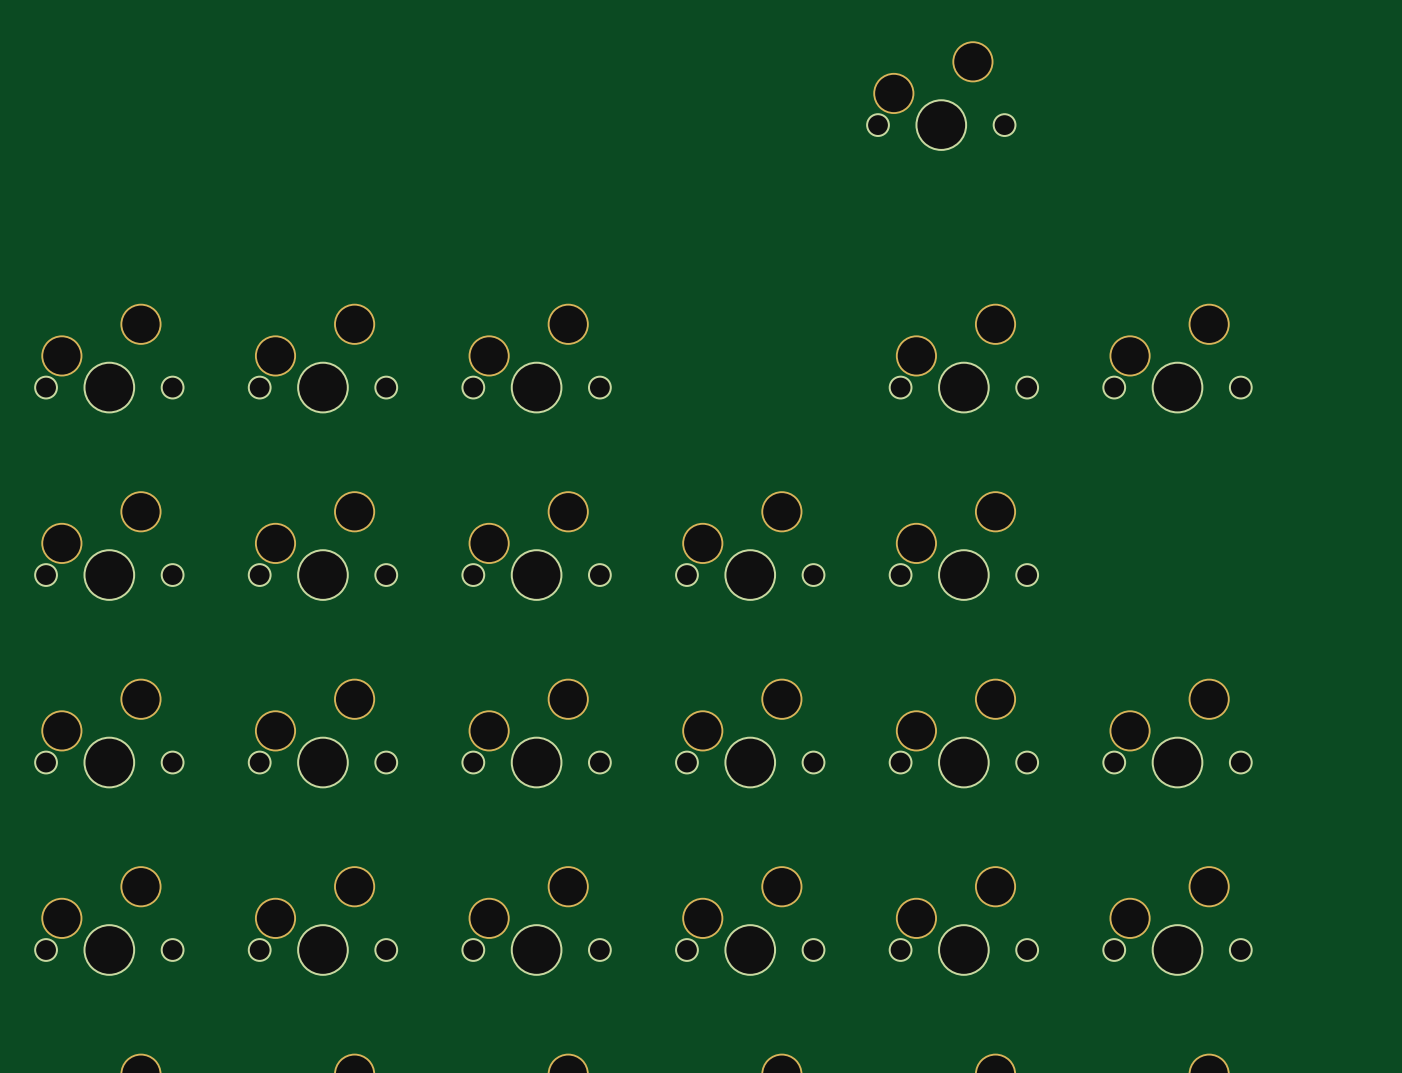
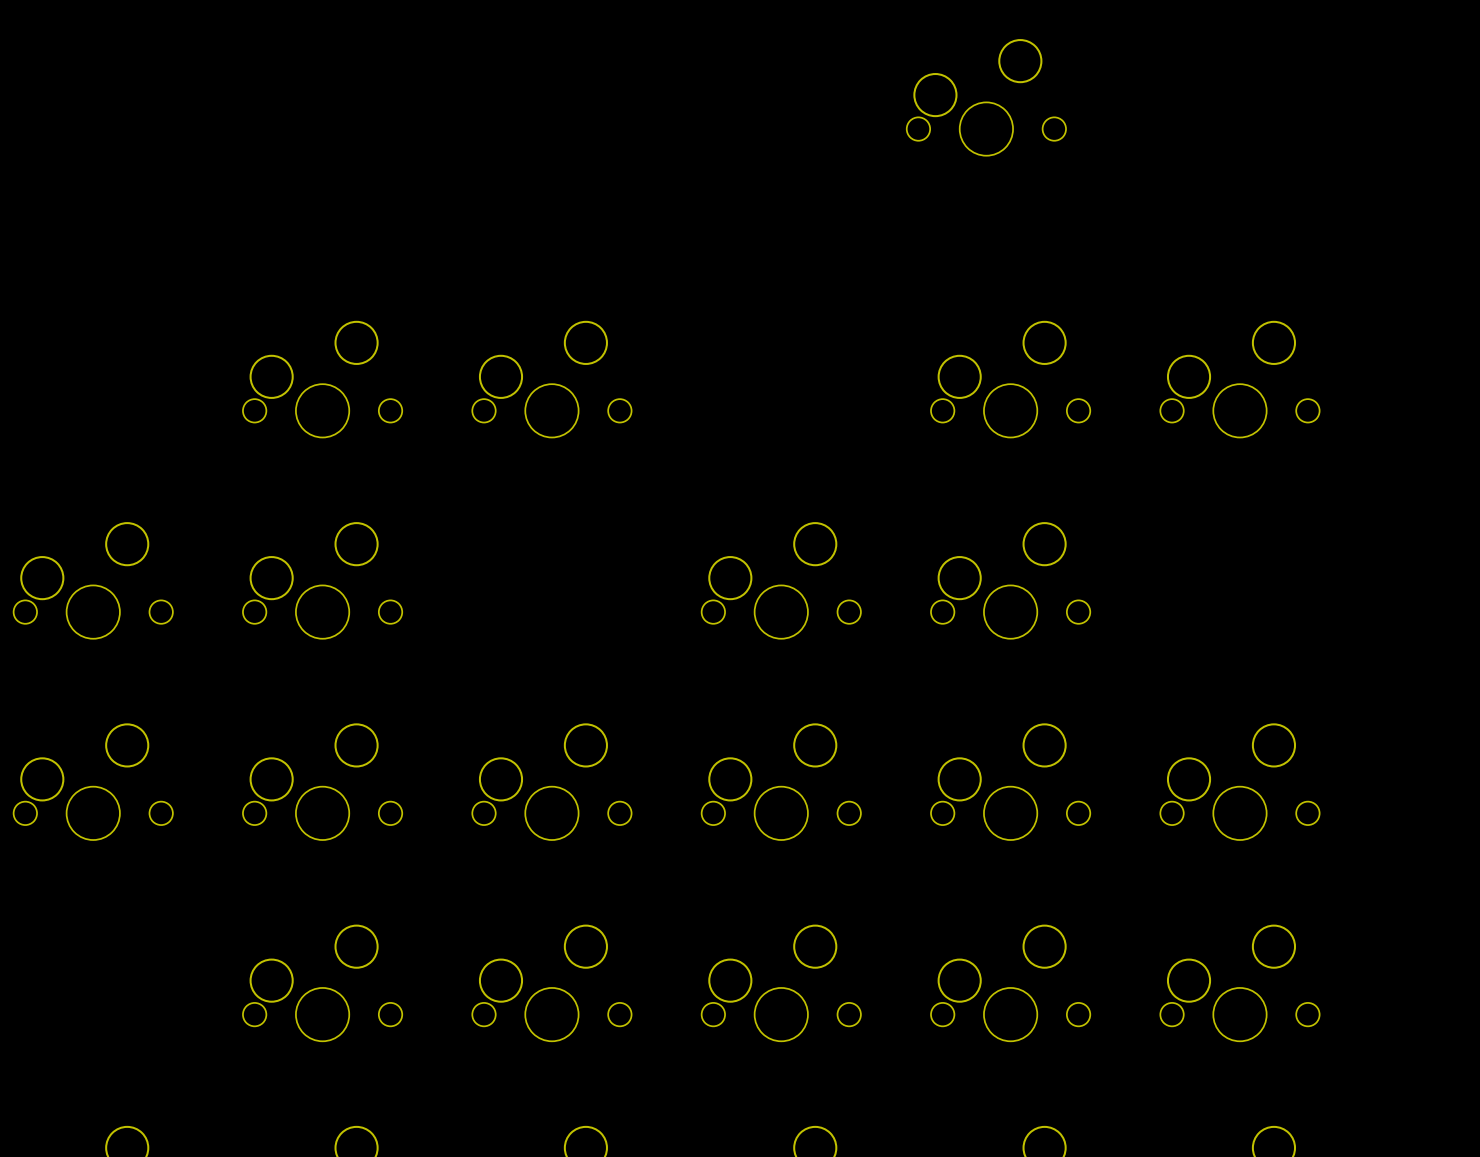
part: (109, 358) -> none
part: (536, 545) -> none
part: (109, 920) -> none

